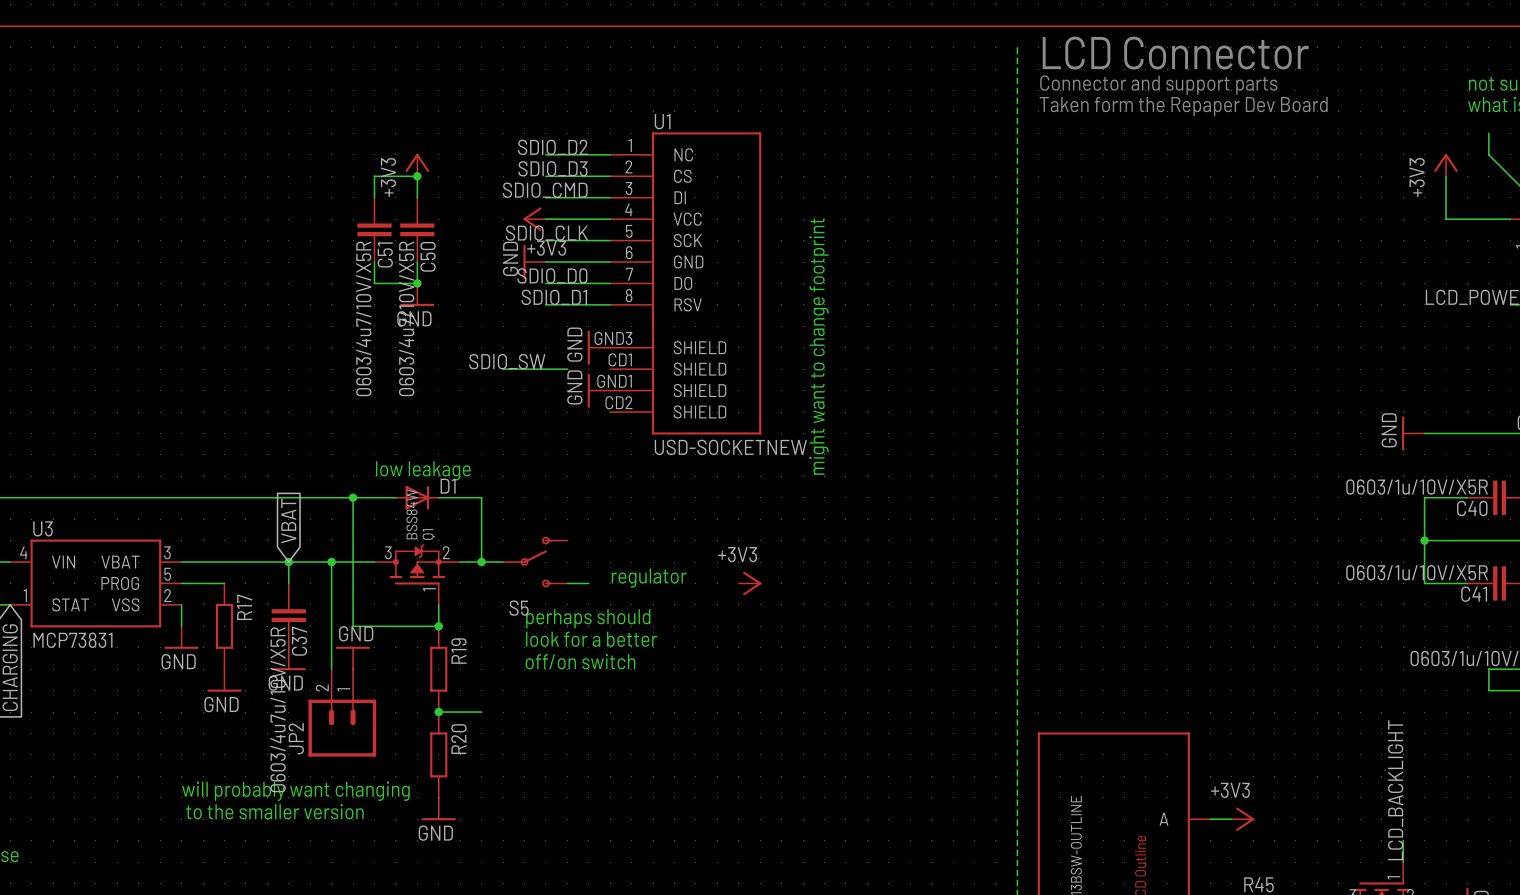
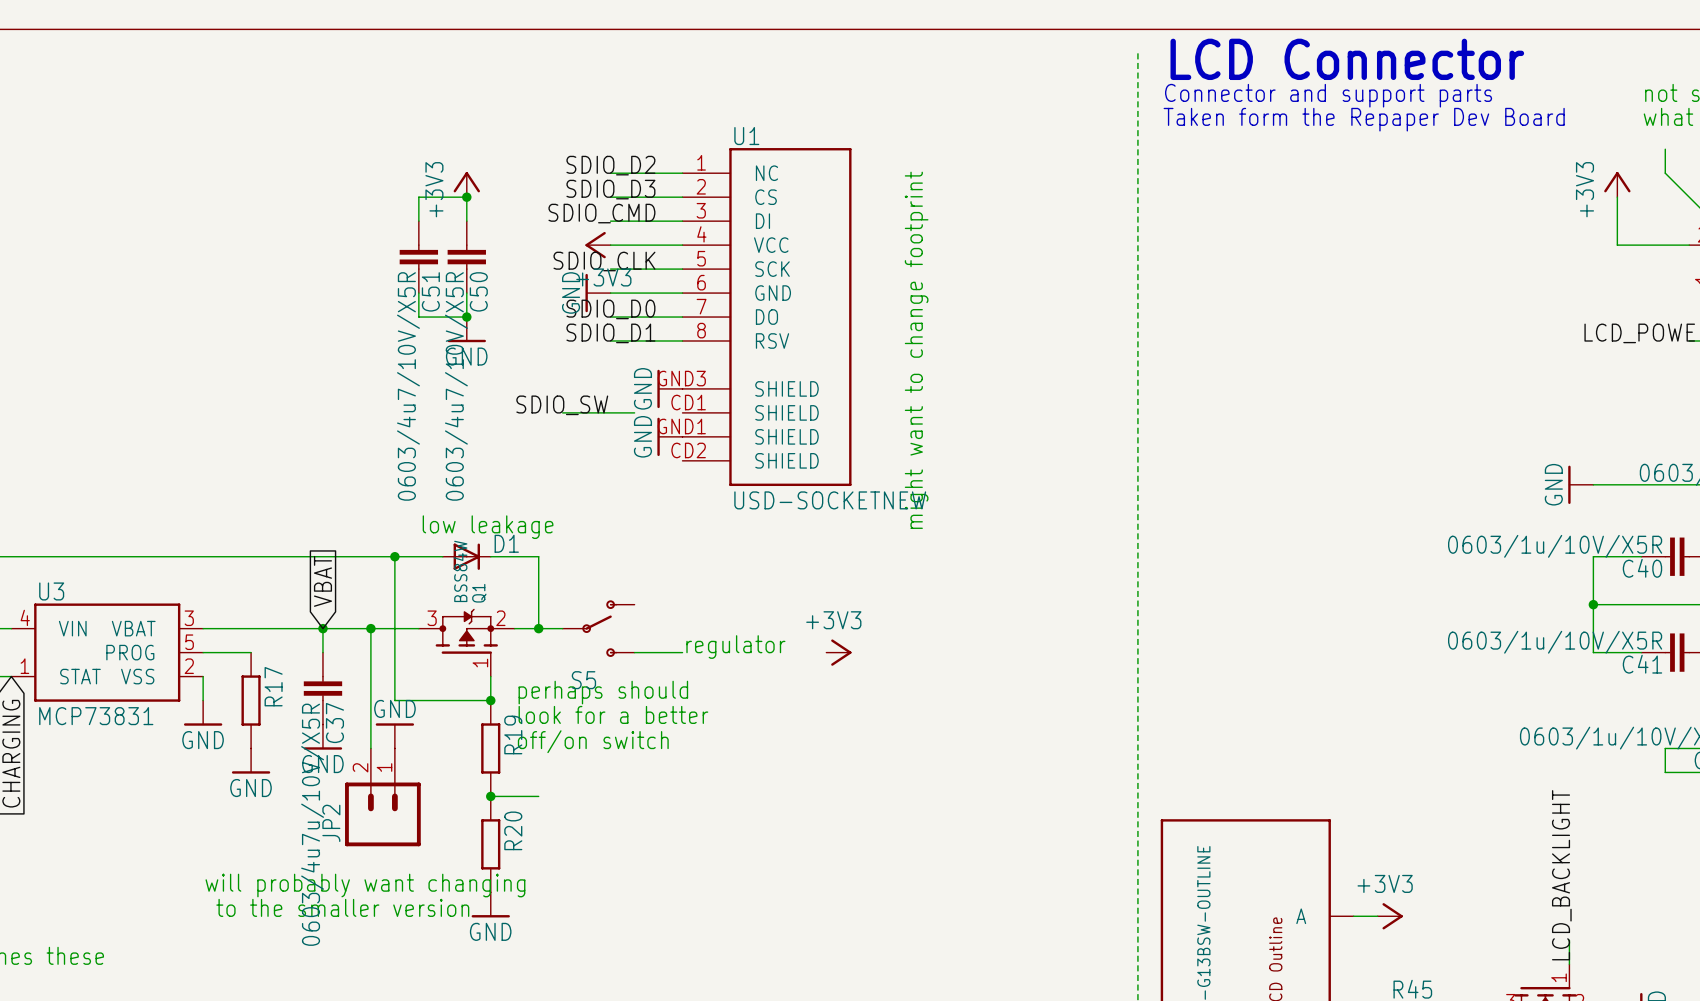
wire: none -> (658, 652) (682, 652)
text position: perhaps should (588, 618) -> perhaps should (603, 692)
text position: look for a better (591, 639) -> look for a better (613, 714)
text position: off/on switch (580, 661) -> off/on switch (593, 741)

